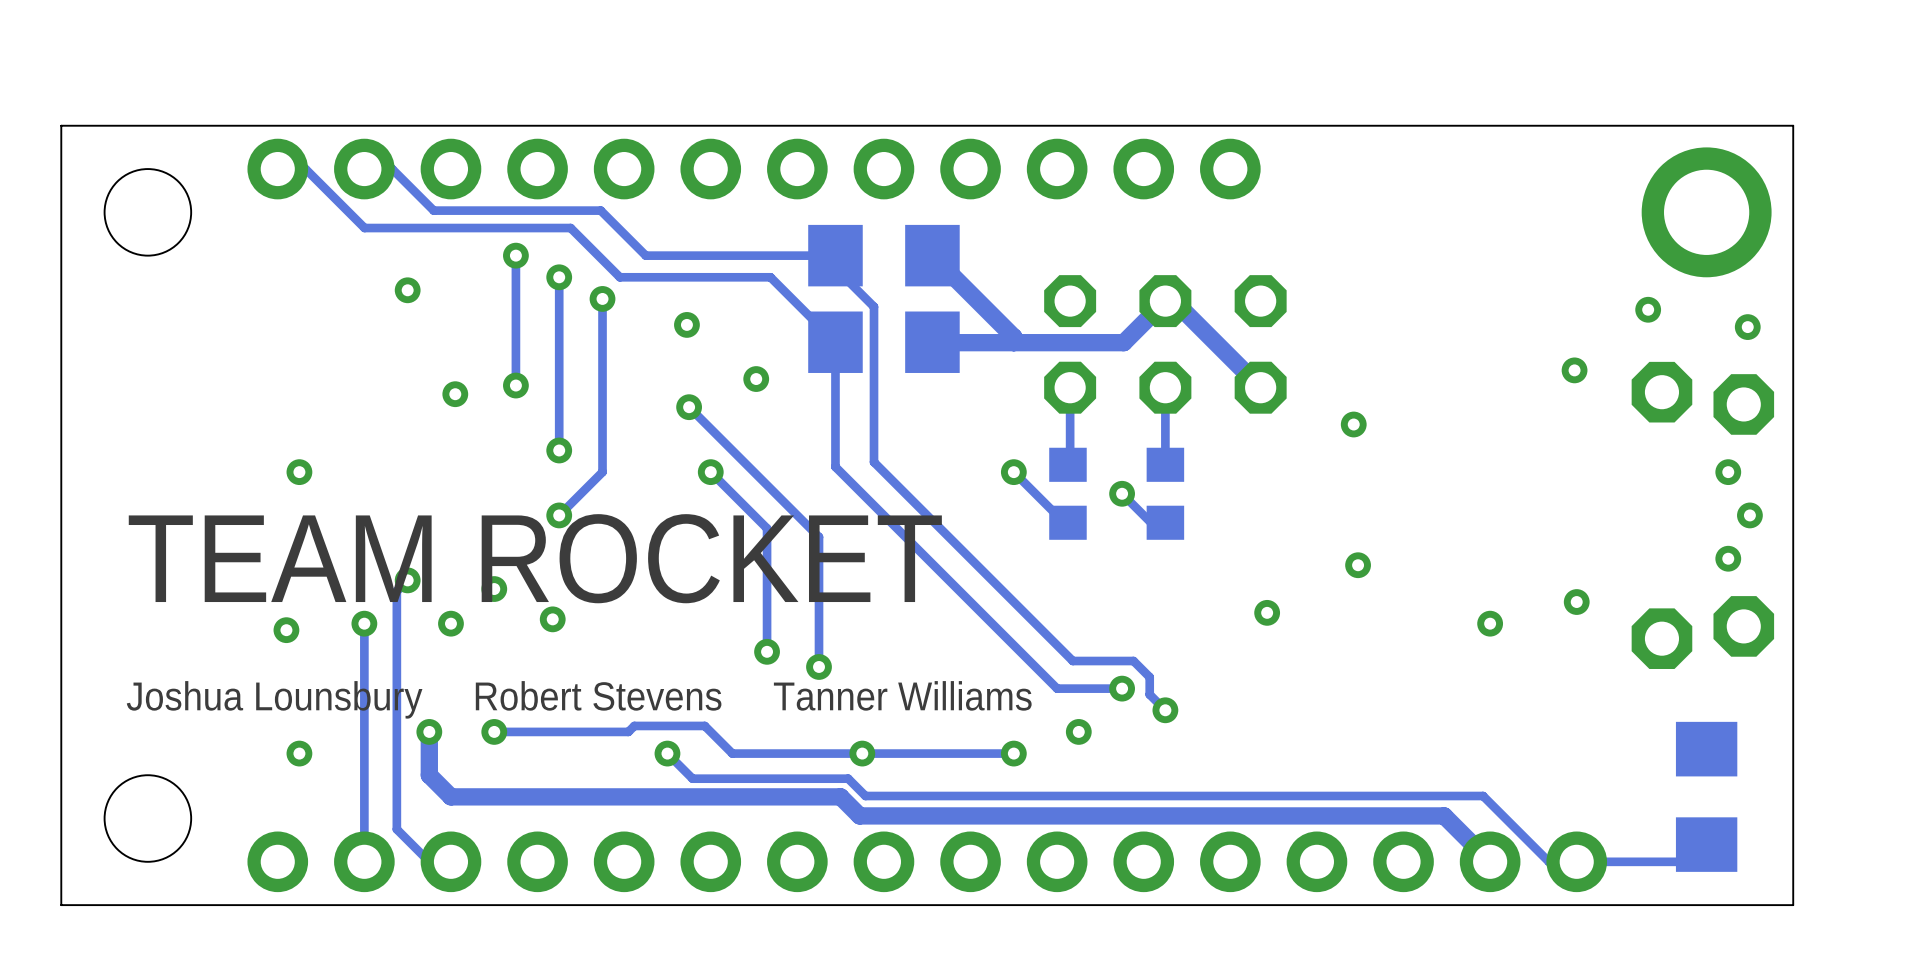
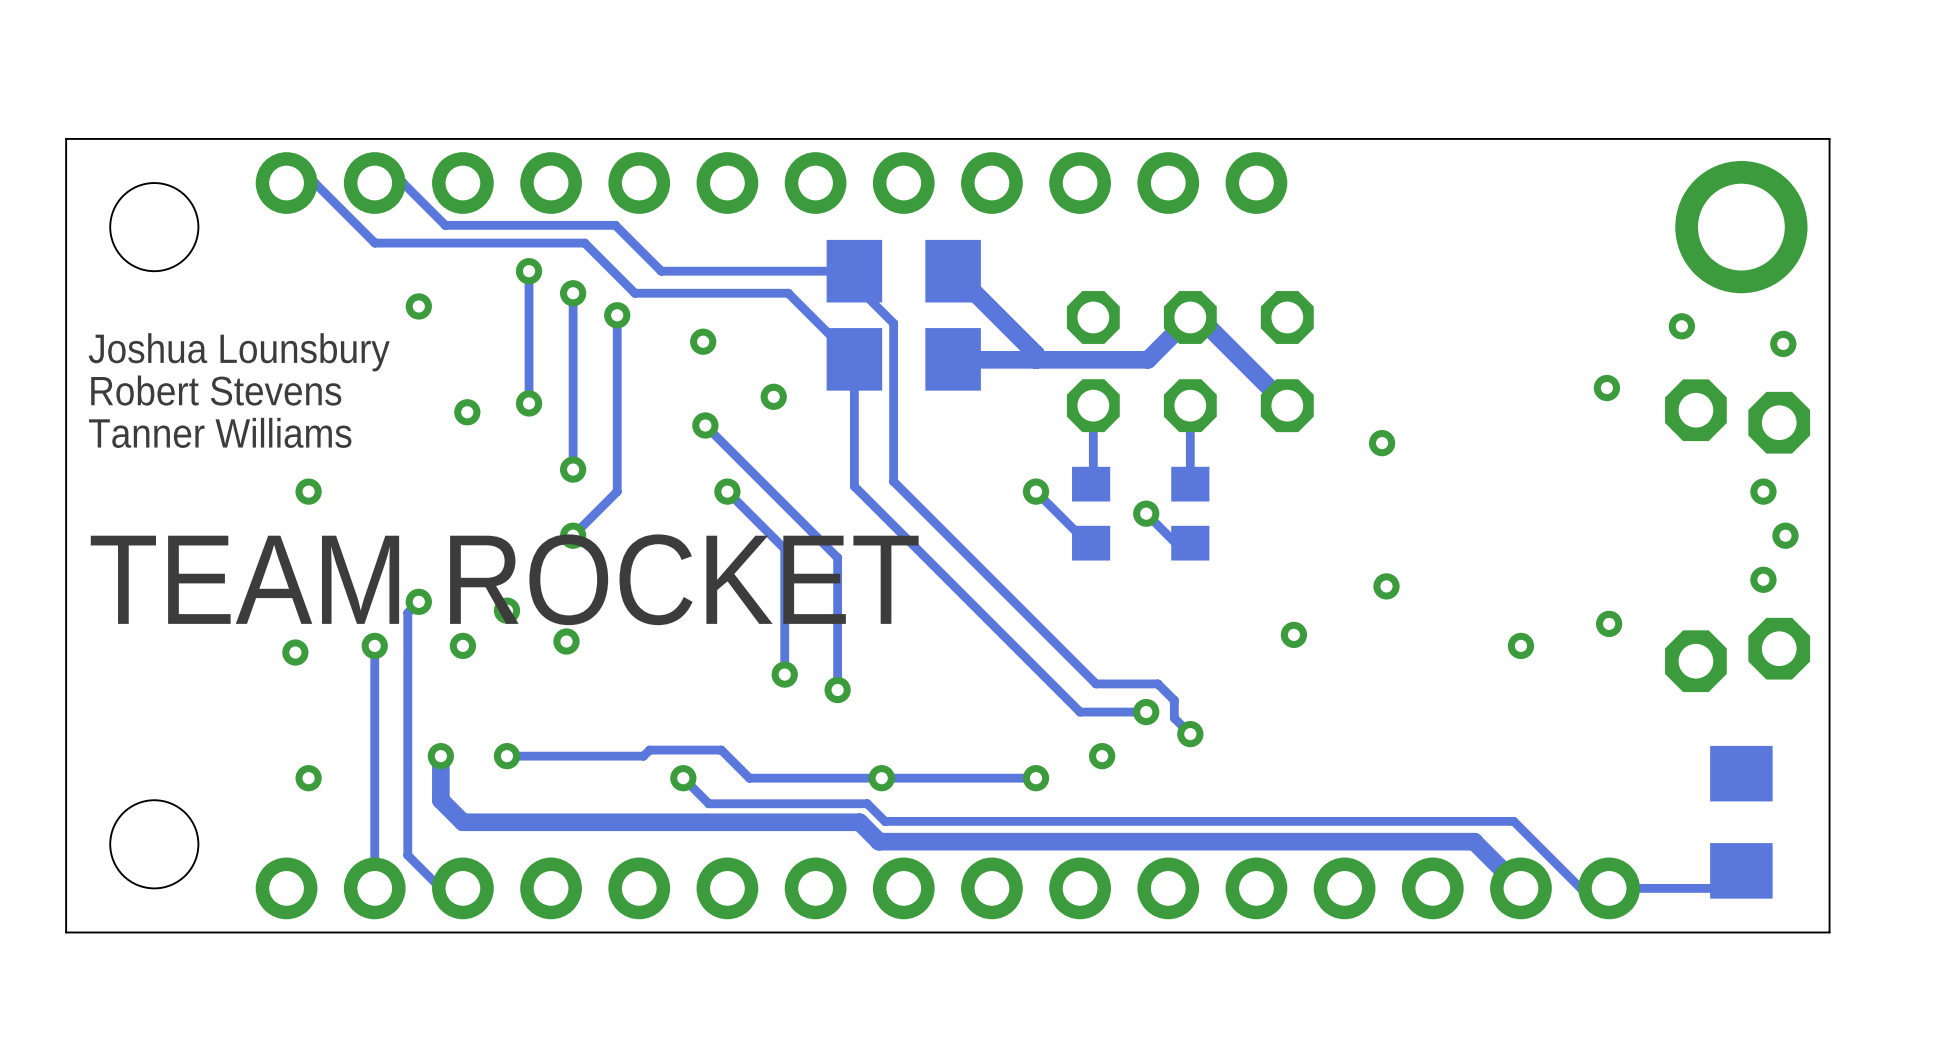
text: none -> Joshua Lounsbury (239, 352)
text: none -> Robert Stevens (216, 390)
text: none -> Tanner Williams (220, 432)
text position: TEAM ROCKET (535, 558) -> TEAM ROCKET (504, 579)
text: Joshua Lounsbury Robert Stevens Tanner Williams (579, 699) -> none

